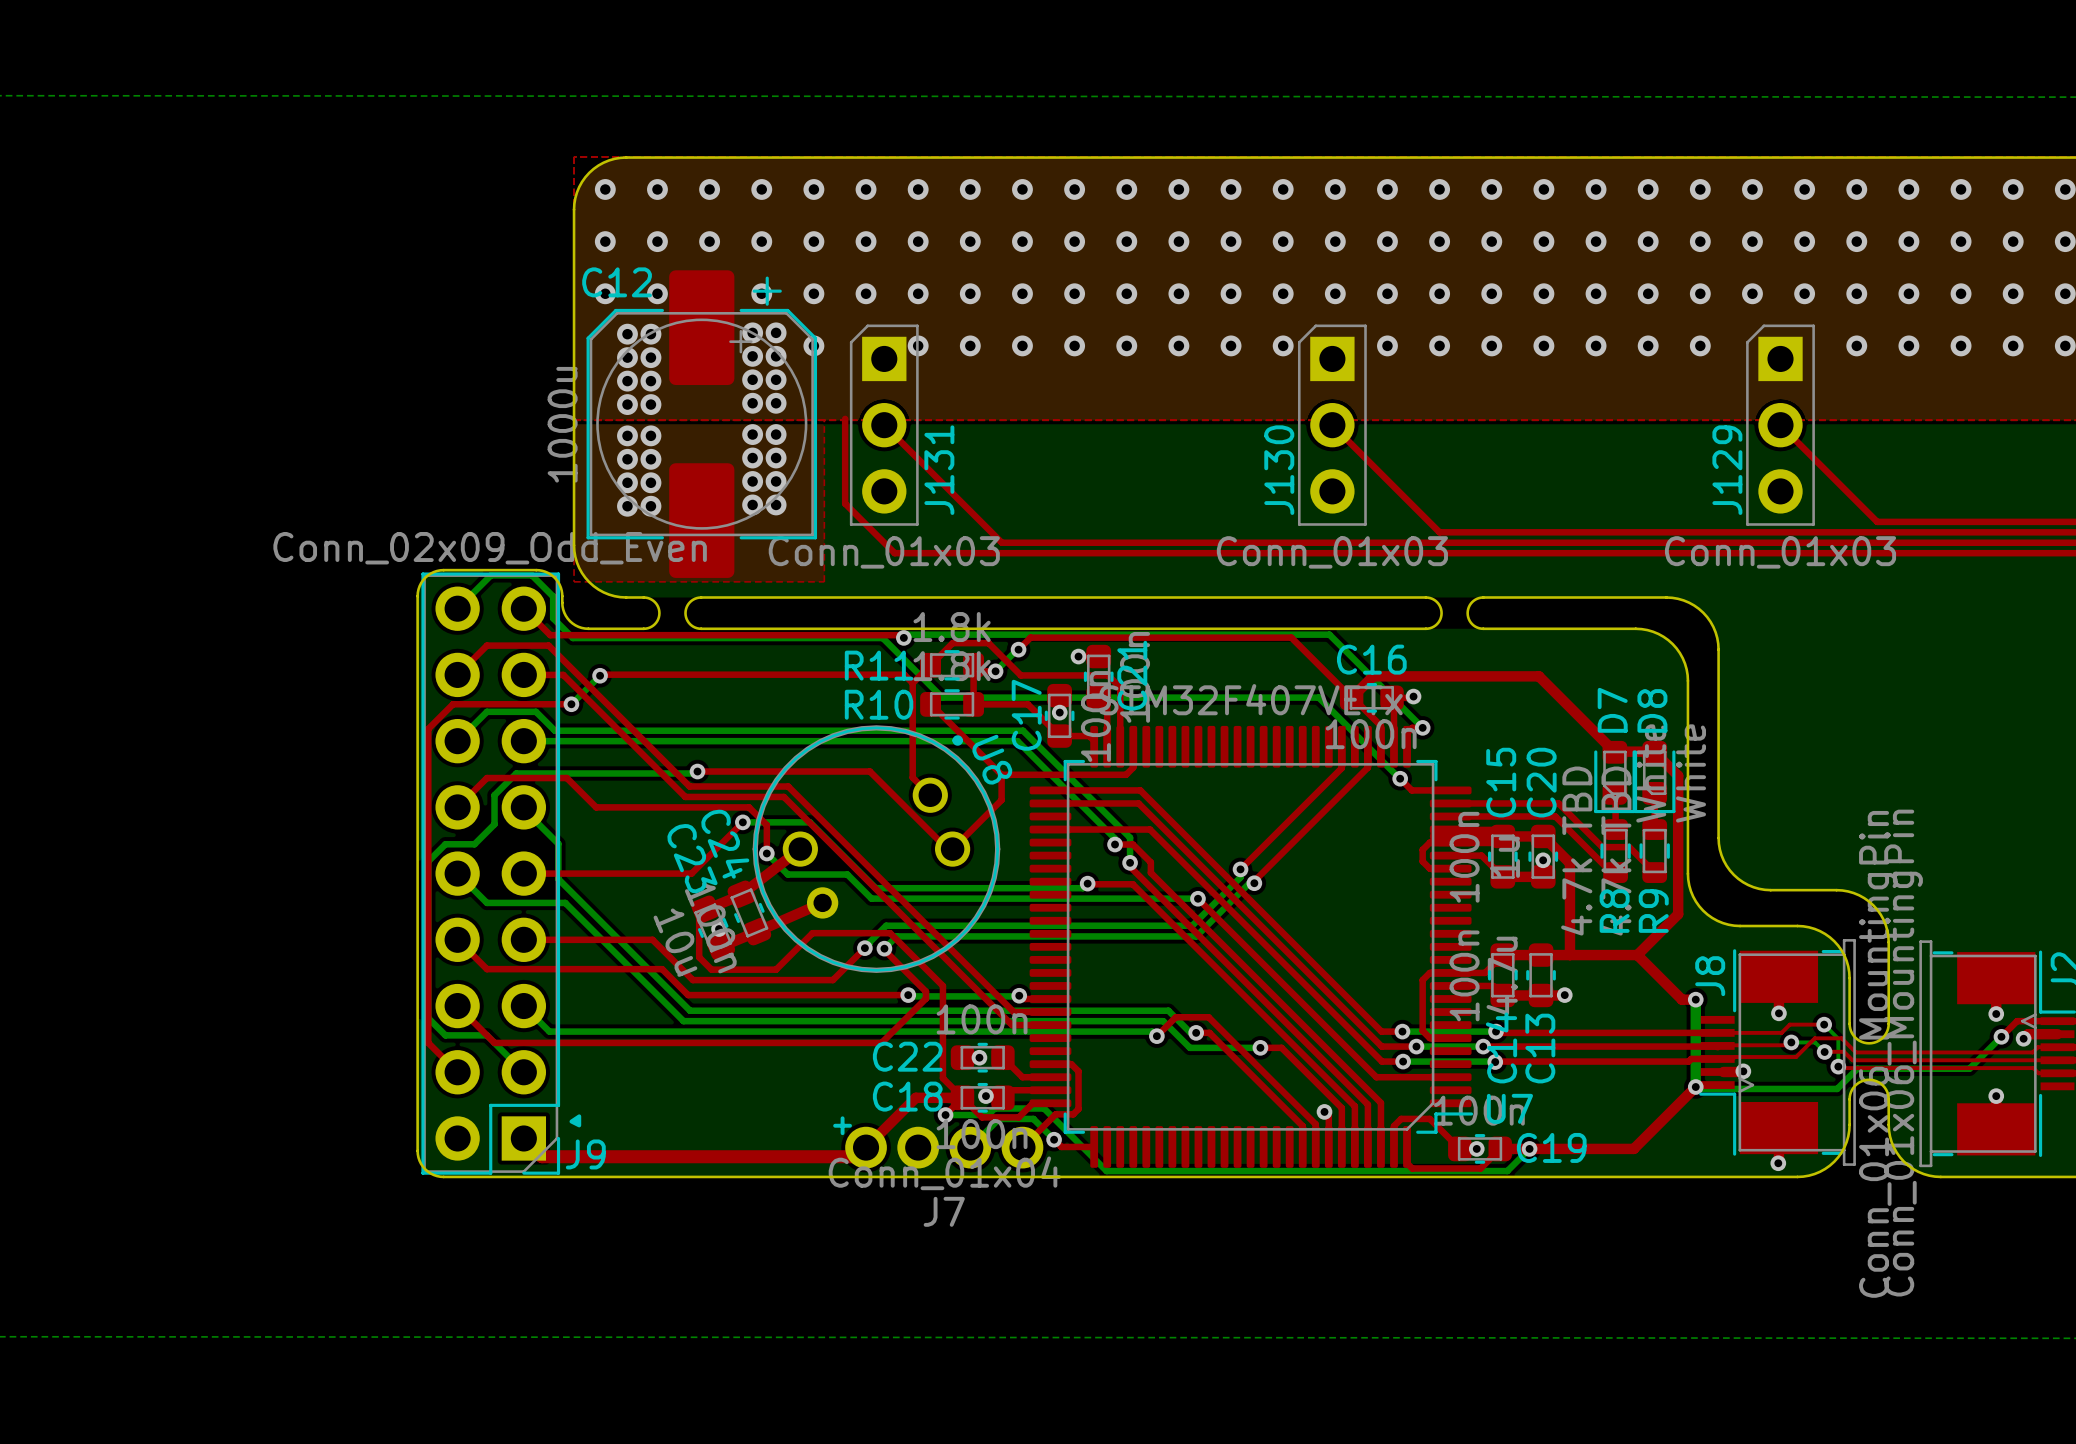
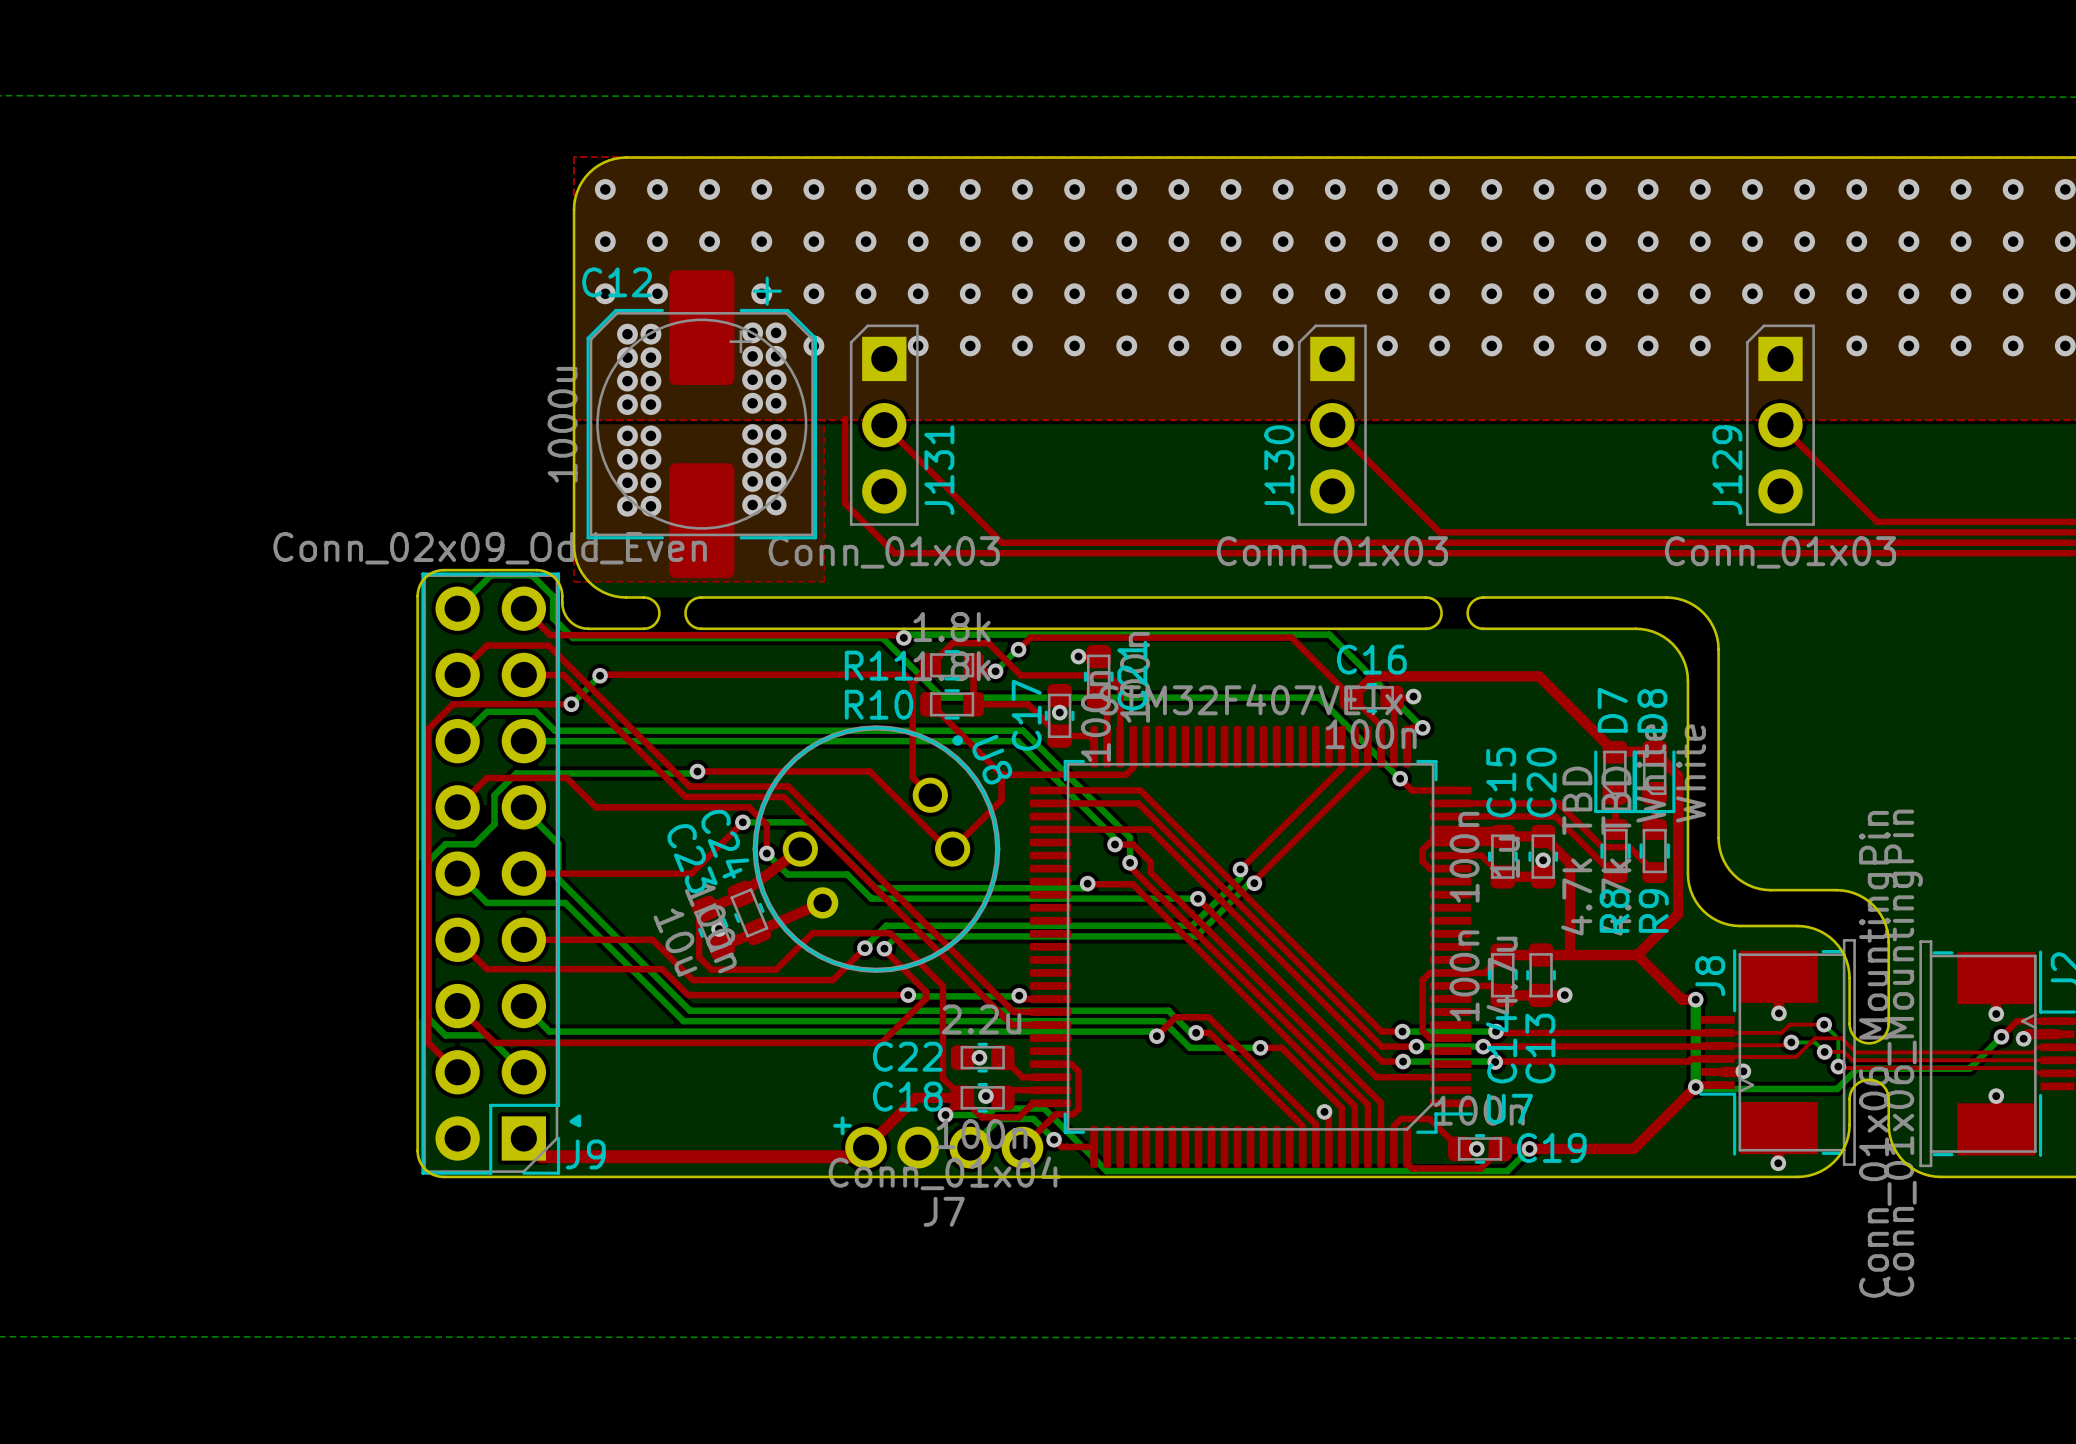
C22 value: 100n (982, 1019) -> 2.2u (981, 1019)

